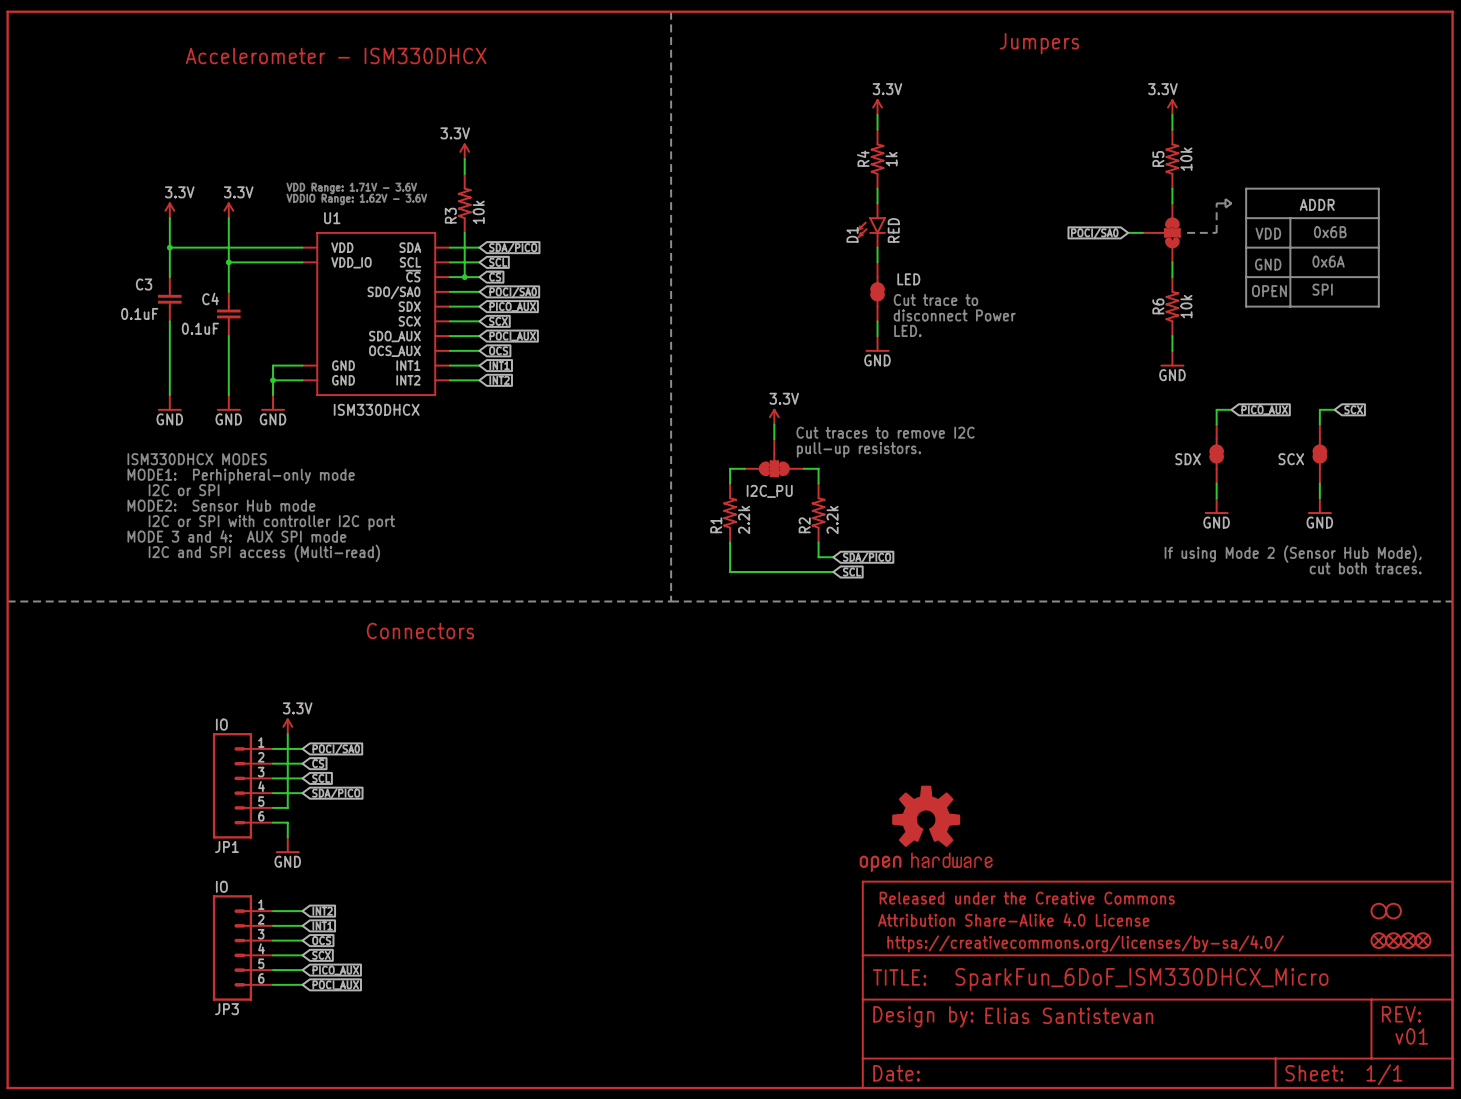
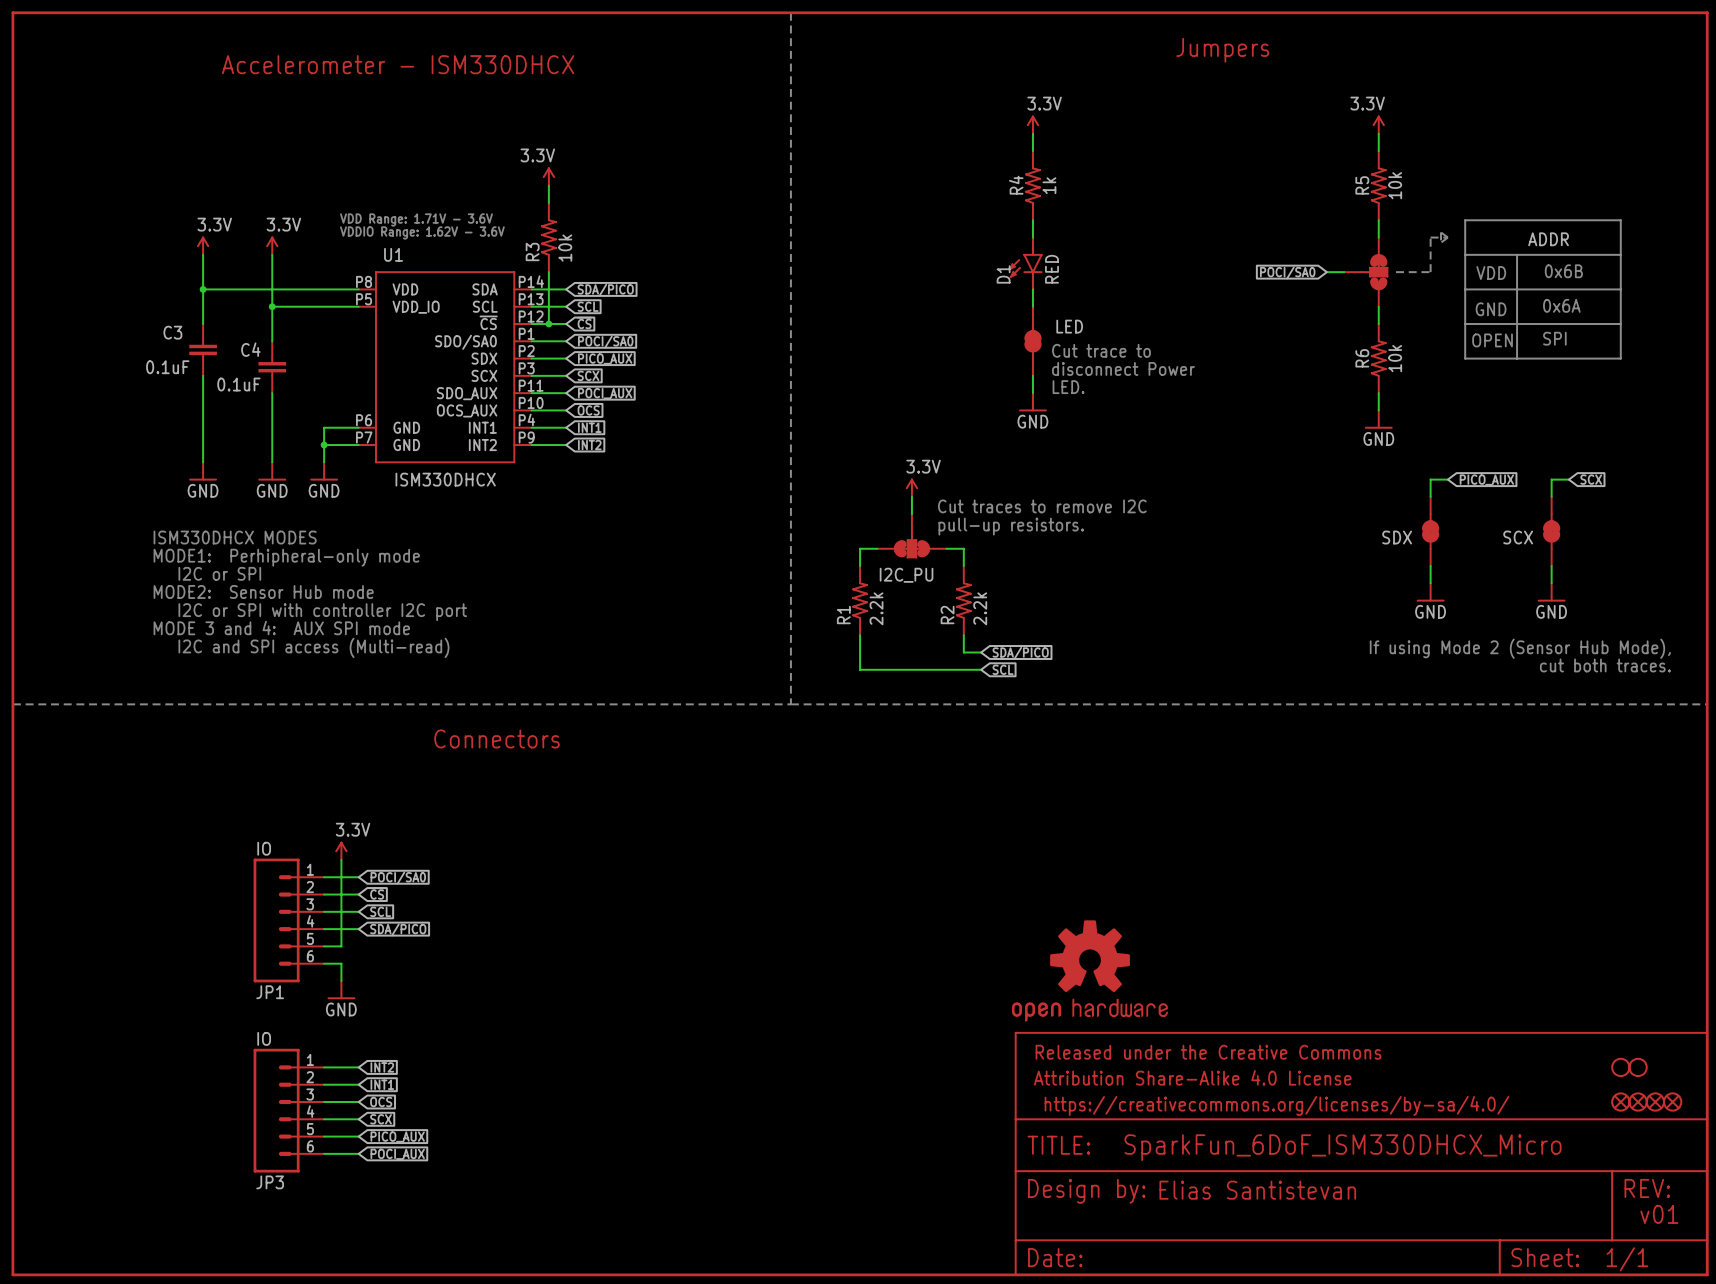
U1 symbol: [302, 232, 450, 396] -> [358, 271, 532, 463]

